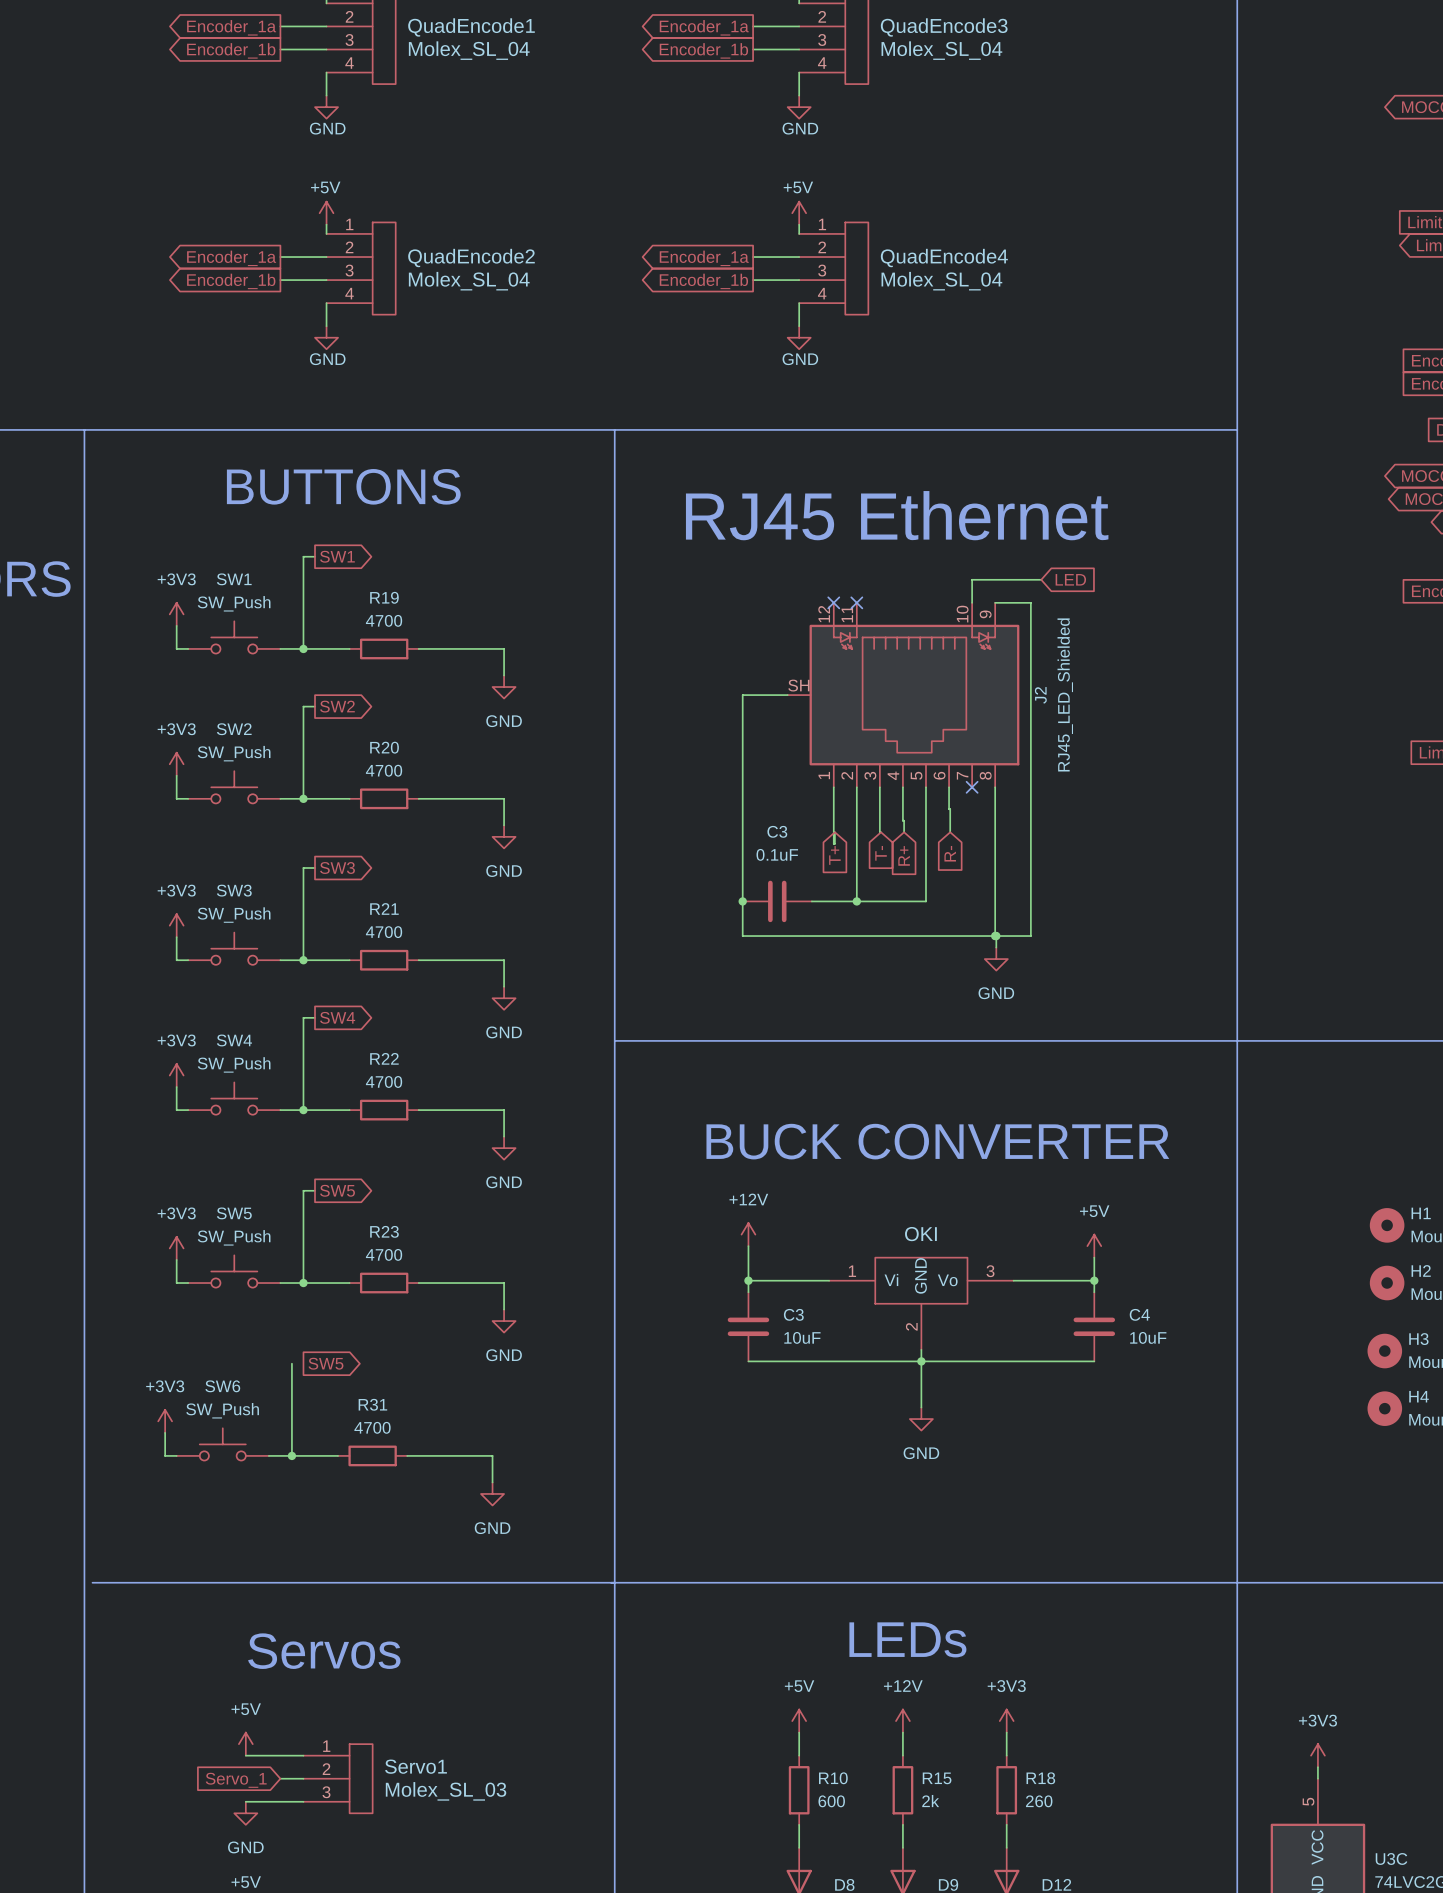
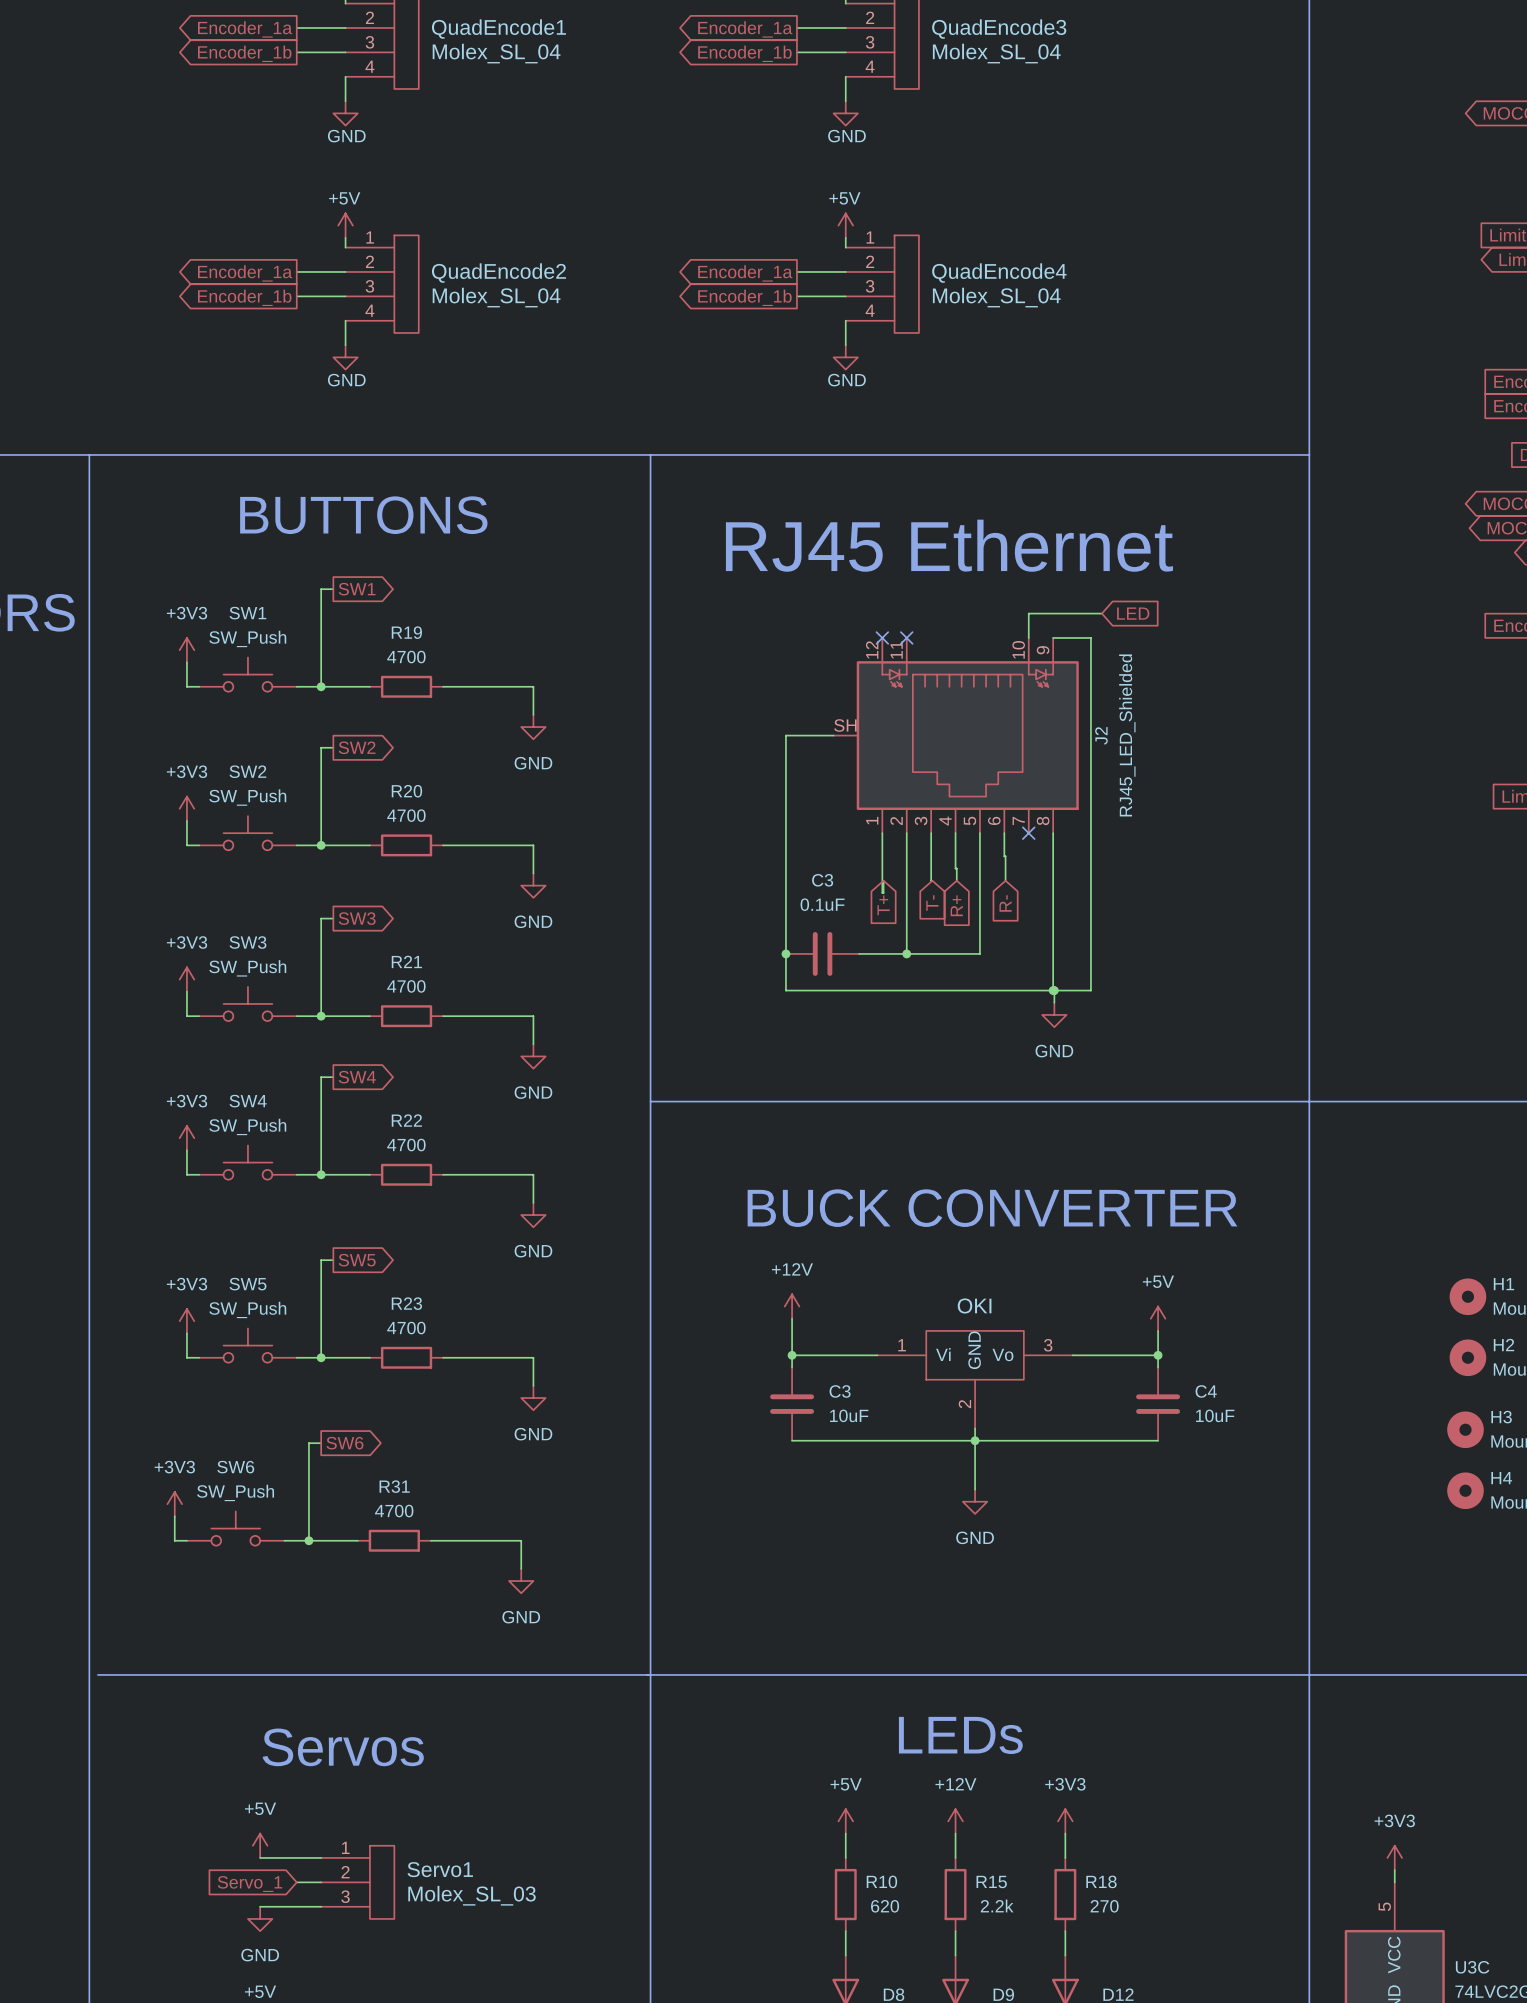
wire: none -> (308, 1443) (321, 1443)
global label: SW5 (325, 1363) -> SW6 (344, 1443)
R10 value: 600 (831, 1801) -> 620 (885, 1906)
R15 value: 2k (930, 1801) -> 2.2k (997, 1905)
R18 value: 260 (1039, 1801) -> 270 (1104, 1906)

